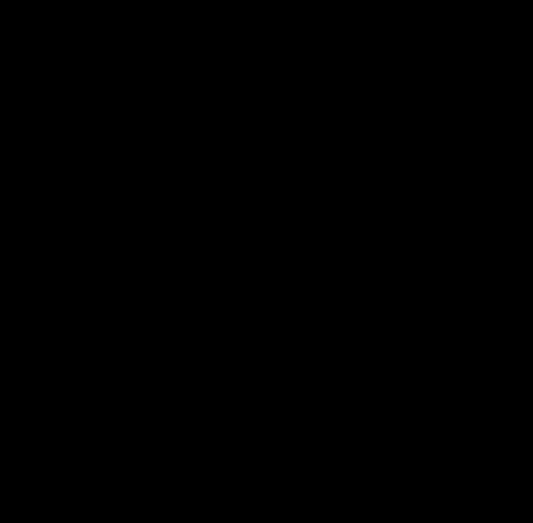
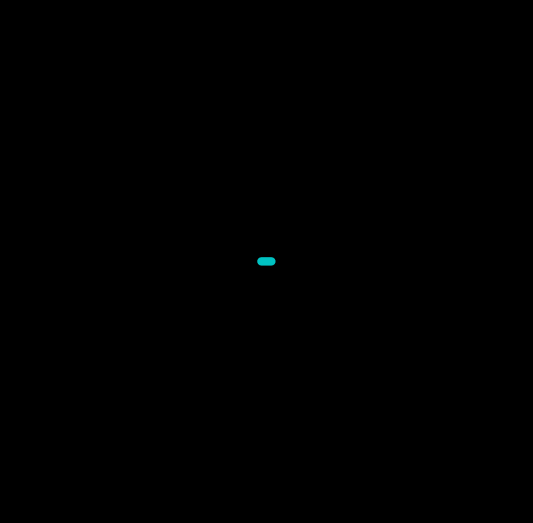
line: none -> (261, 261) (271, 261)

